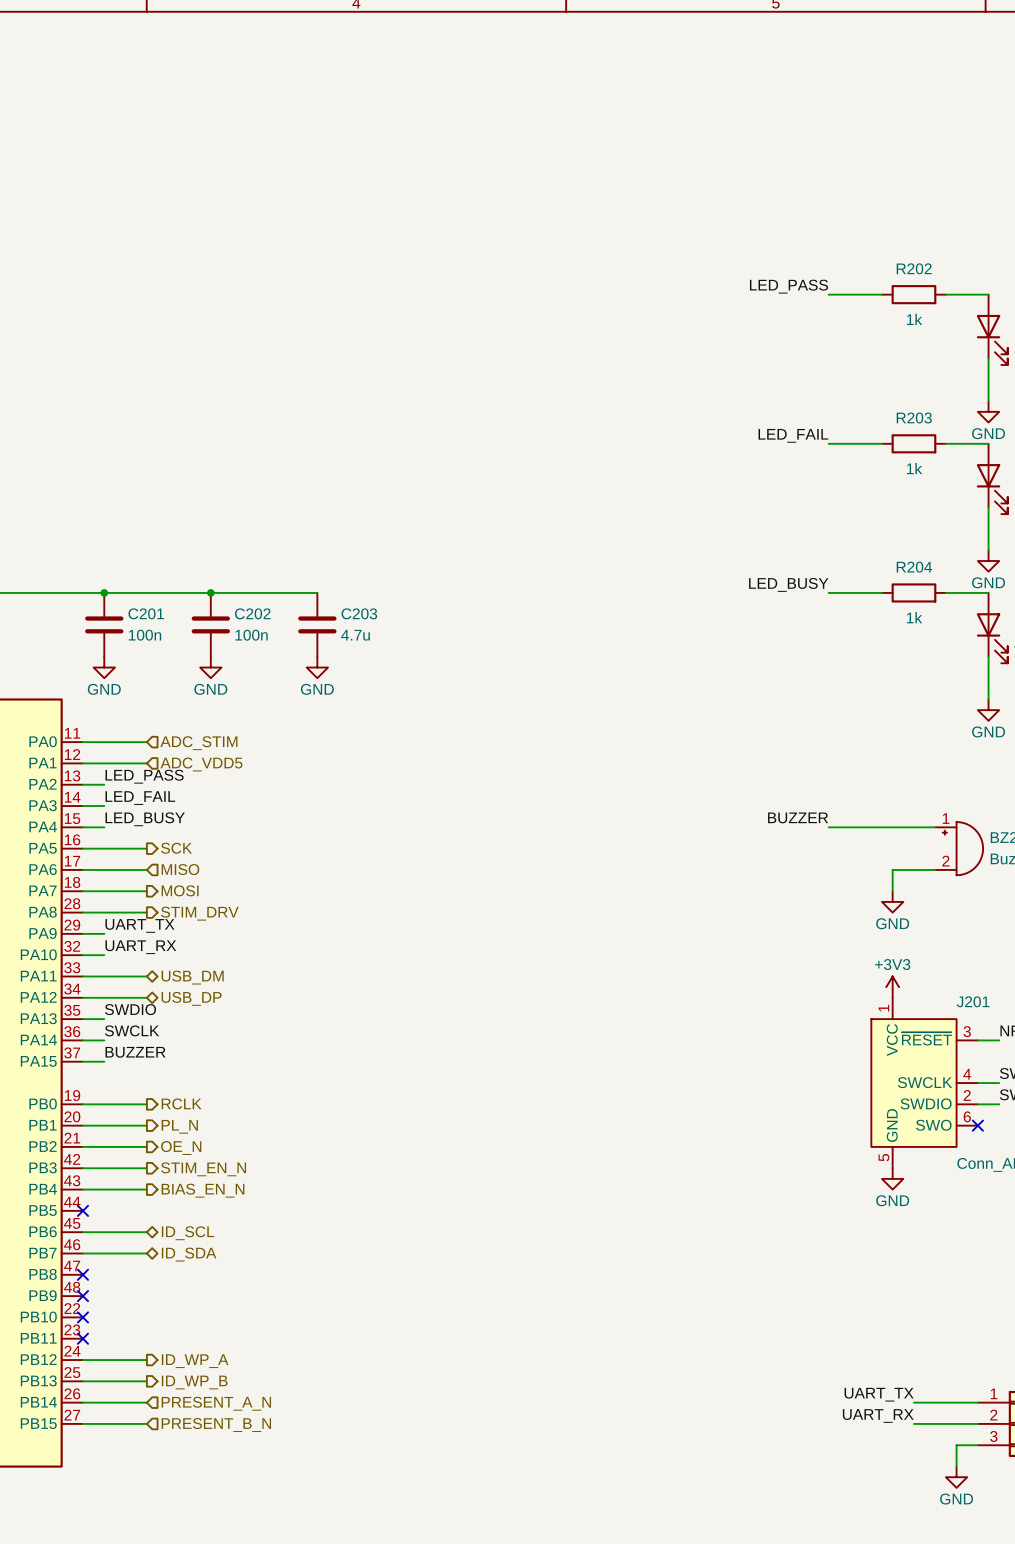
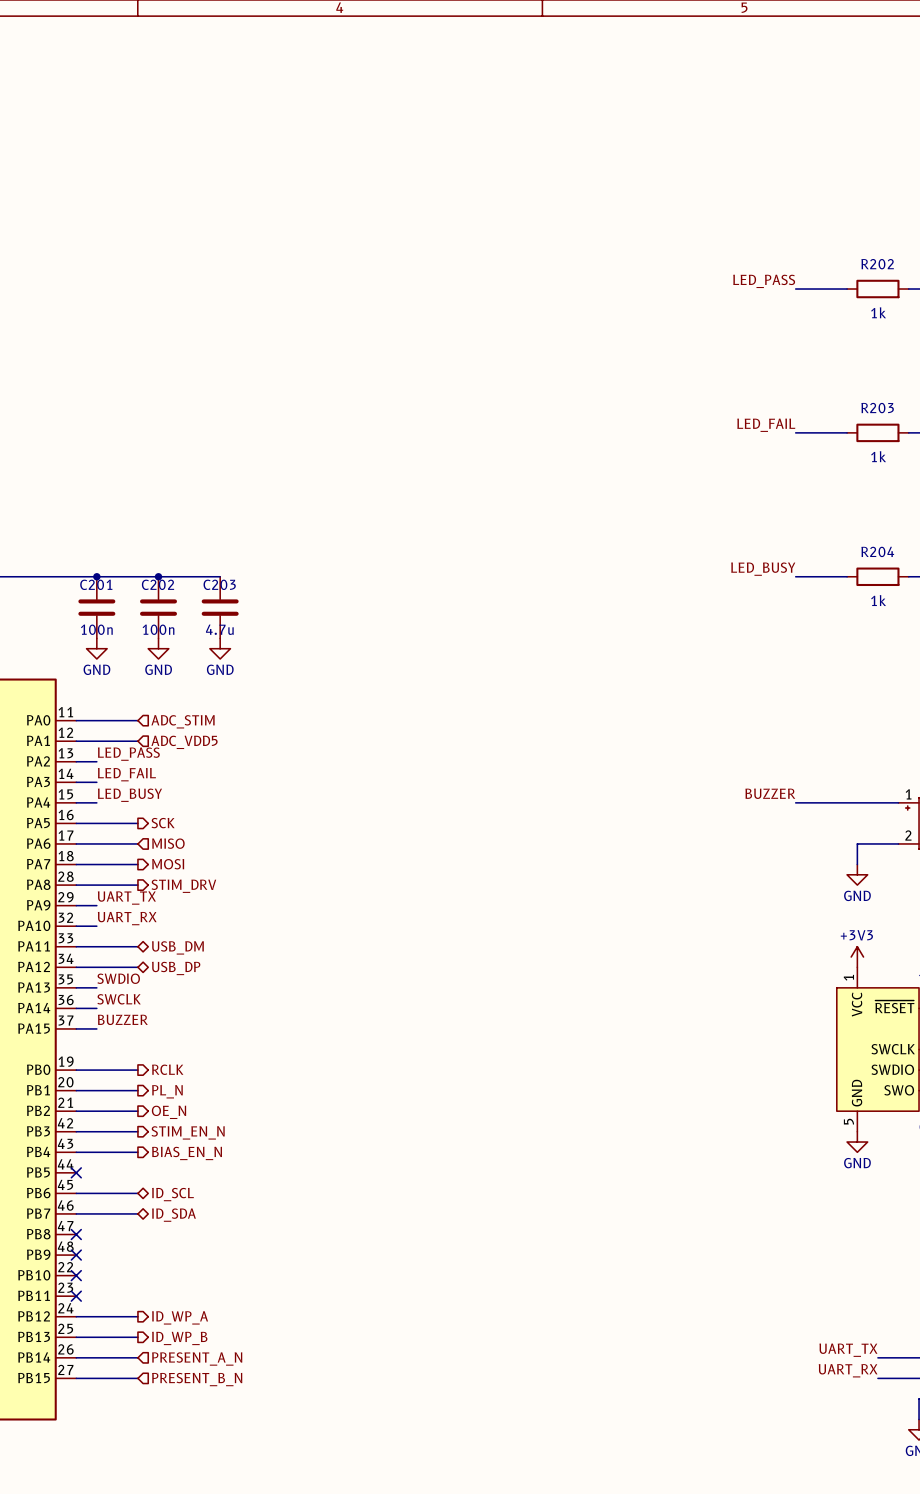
junction position: (210, 592) -> (158, 576)
wire: (232, 592) (317, 592) -> none
C201 name position: C201 (146, 613) -> C201 (96, 584)
C202 name position: C202 (252, 613) -> C202 (157, 584)
C203 name position: C203 (359, 613) -> C203 (219, 584)
C202 position: (210, 624) -> (158, 607)
C203 position: (317, 624) -> (220, 607)
C201 value position: 100n (145, 635) -> 100n (96, 629)
C202 value position: 100n (251, 635) -> 100n (158, 629)
C203 value position: 4.7u (355, 635) -> 4.7u (219, 629)
power symbol: none -> GND (158, 648)
power symbol: GND (210, 667) -> none
power symbol: none -> GND (220, 648)
power symbol: GND (317, 667) -> none

